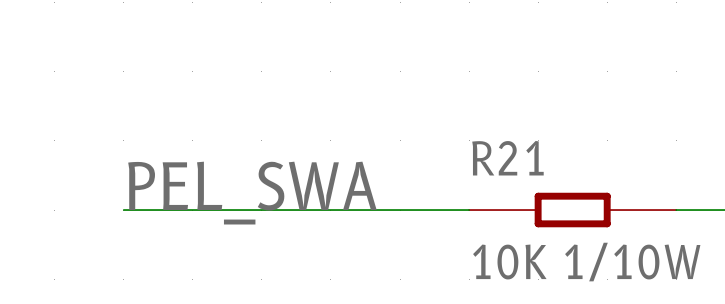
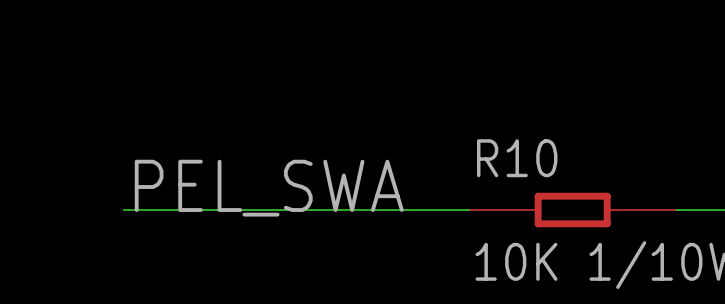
R21 name: R21 (507, 158) -> R10 (517, 158)

